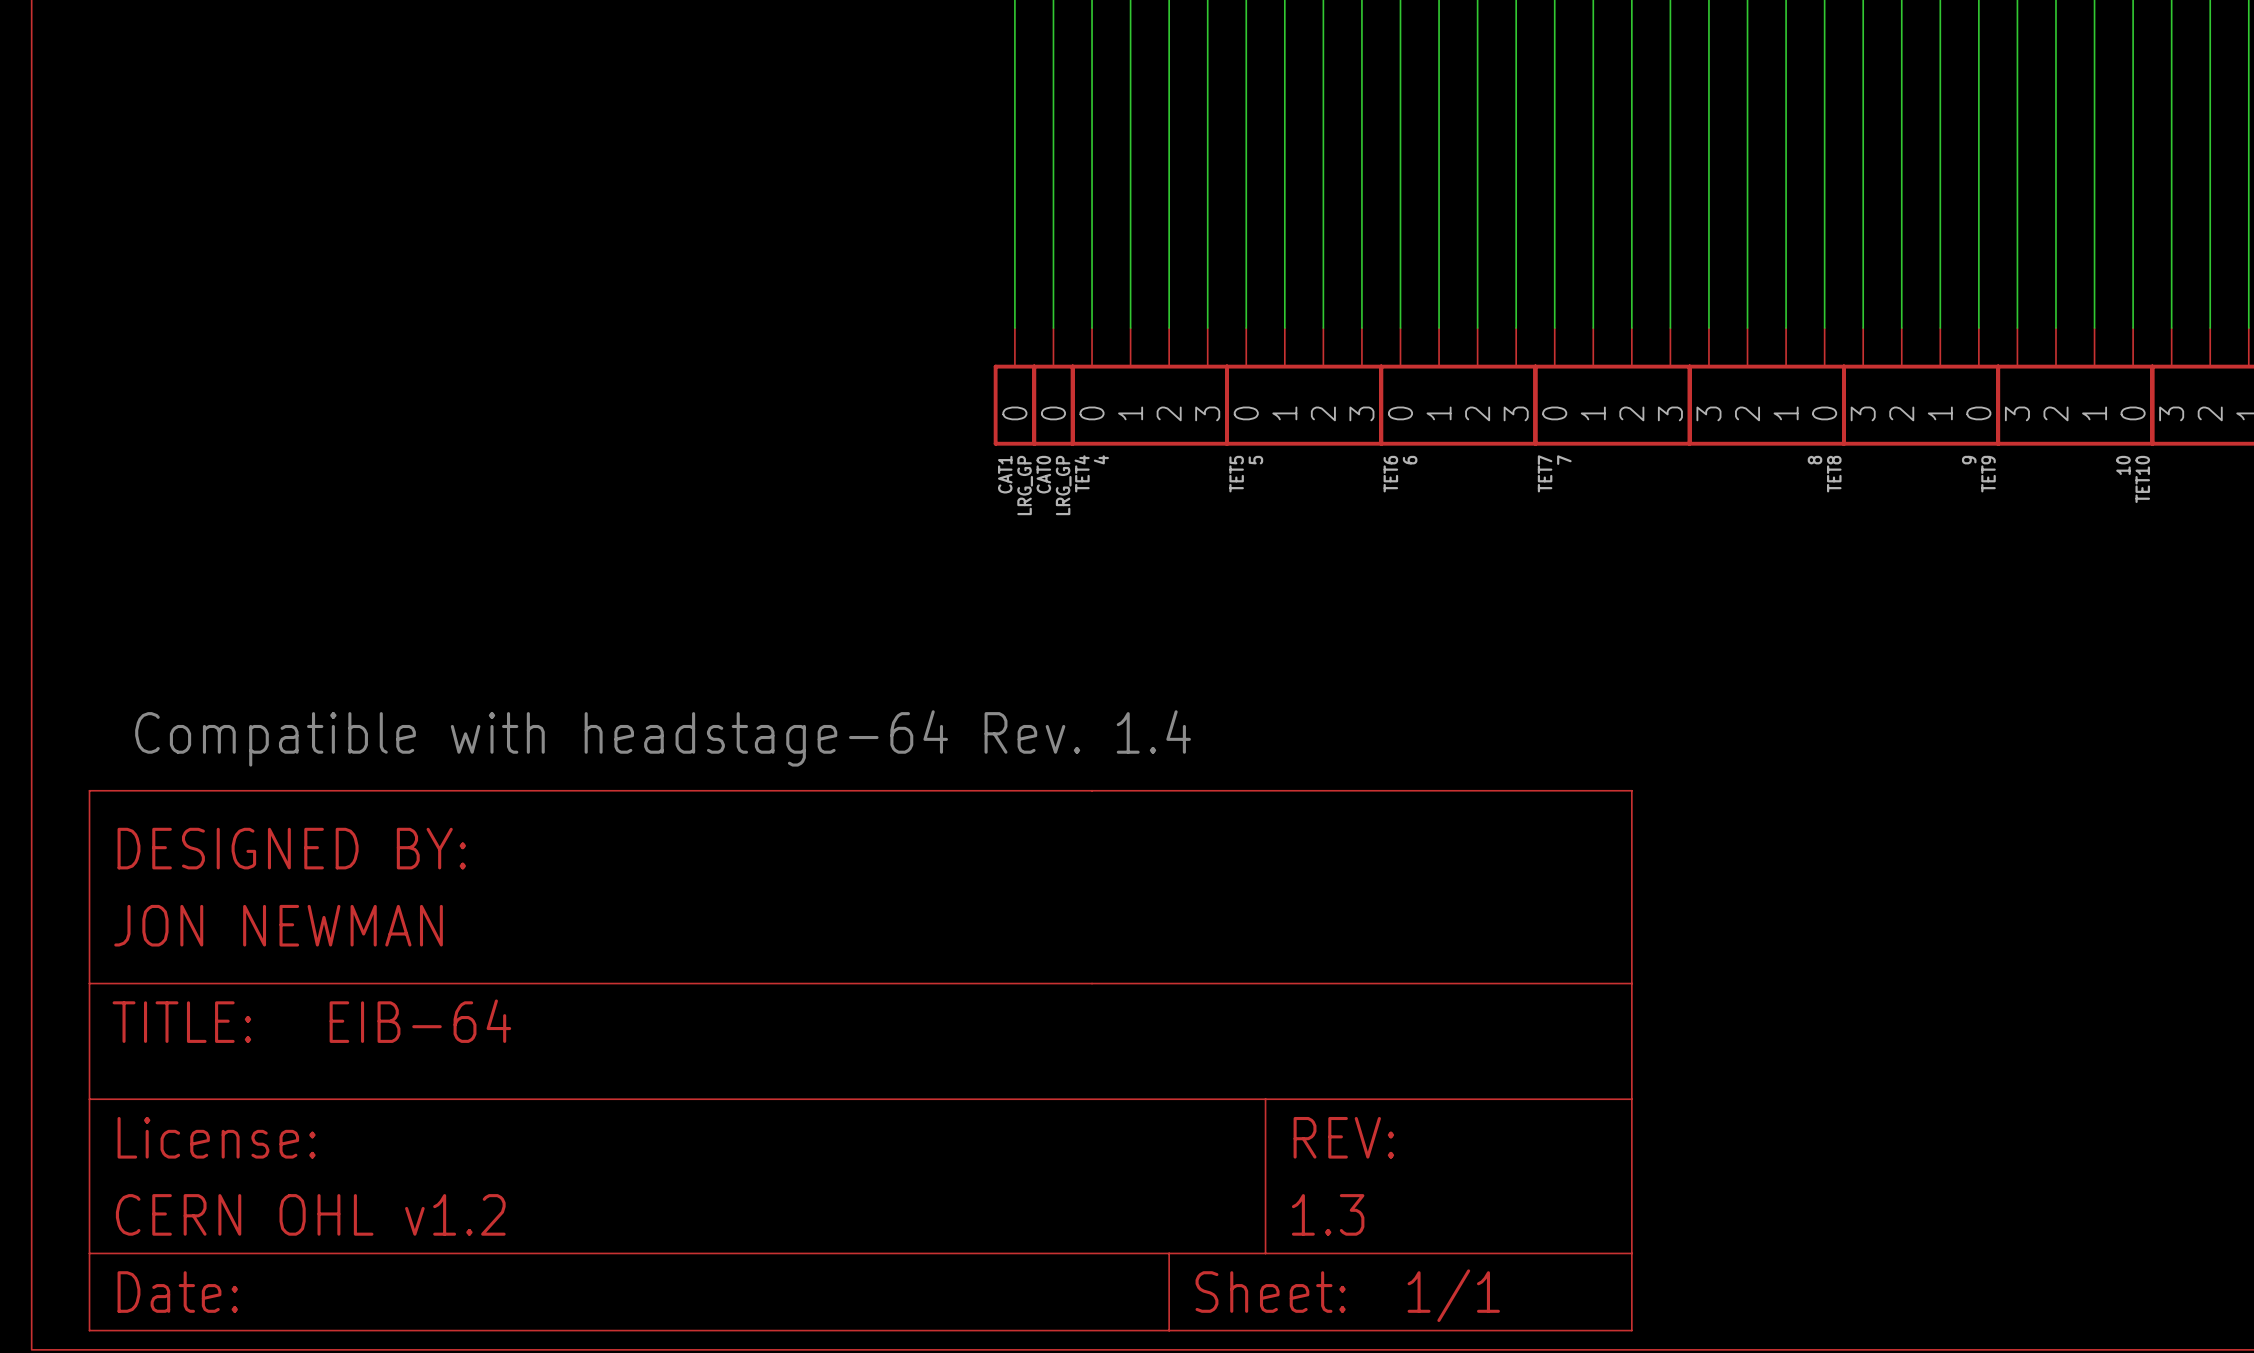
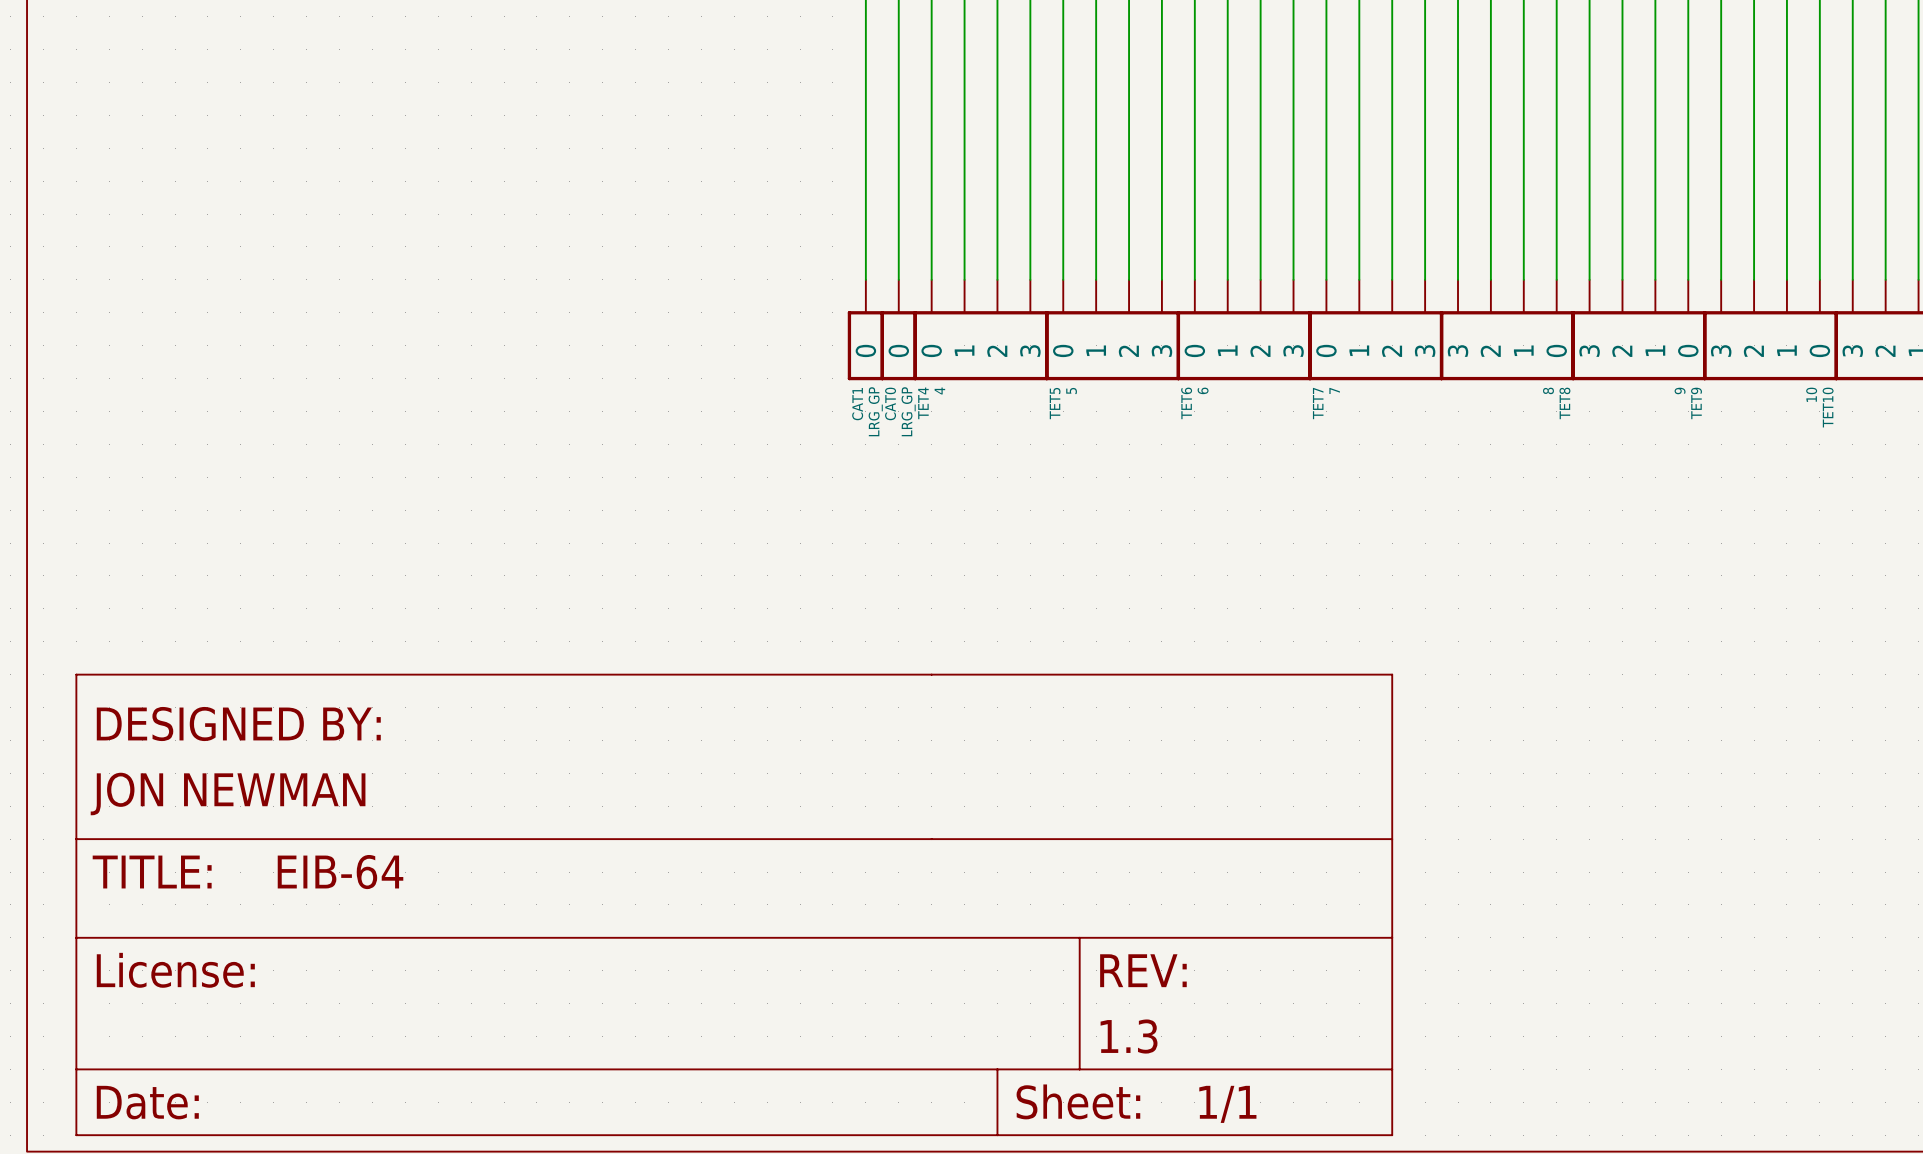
text: Compatible with headstage-64 Rev. 1.4 (663, 738) -> none
part text: CERN OHL v1.2 (310, 1214) -> none

